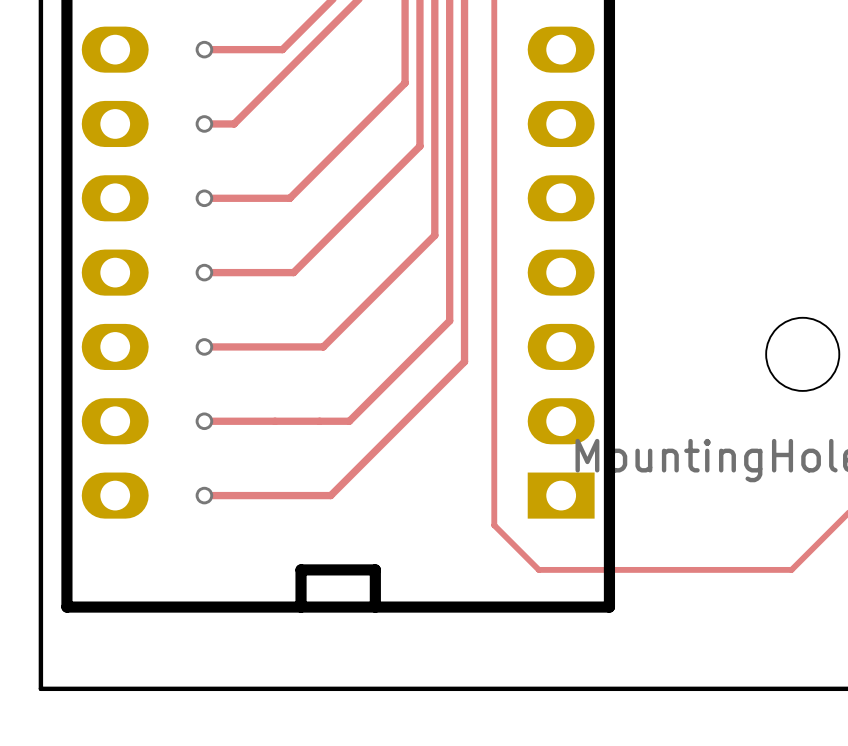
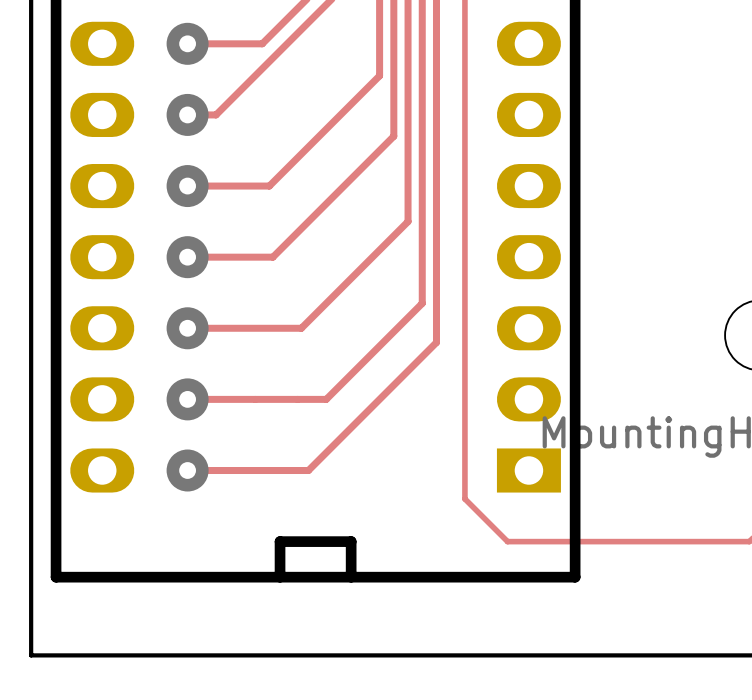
via size: [195, 40, 214, 59] -> [166, 22, 209, 65]
via size: [195, 115, 214, 133] -> [166, 93, 209, 136]
via size: [195, 189, 214, 208] -> [166, 165, 209, 208]
via size: [195, 263, 214, 282] -> [166, 236, 209, 279]
via size: [195, 338, 214, 356] -> [166, 307, 209, 350]
via size: [195, 412, 214, 431] -> [166, 378, 209, 421]
via size: [195, 486, 214, 505] -> [166, 449, 209, 492]

